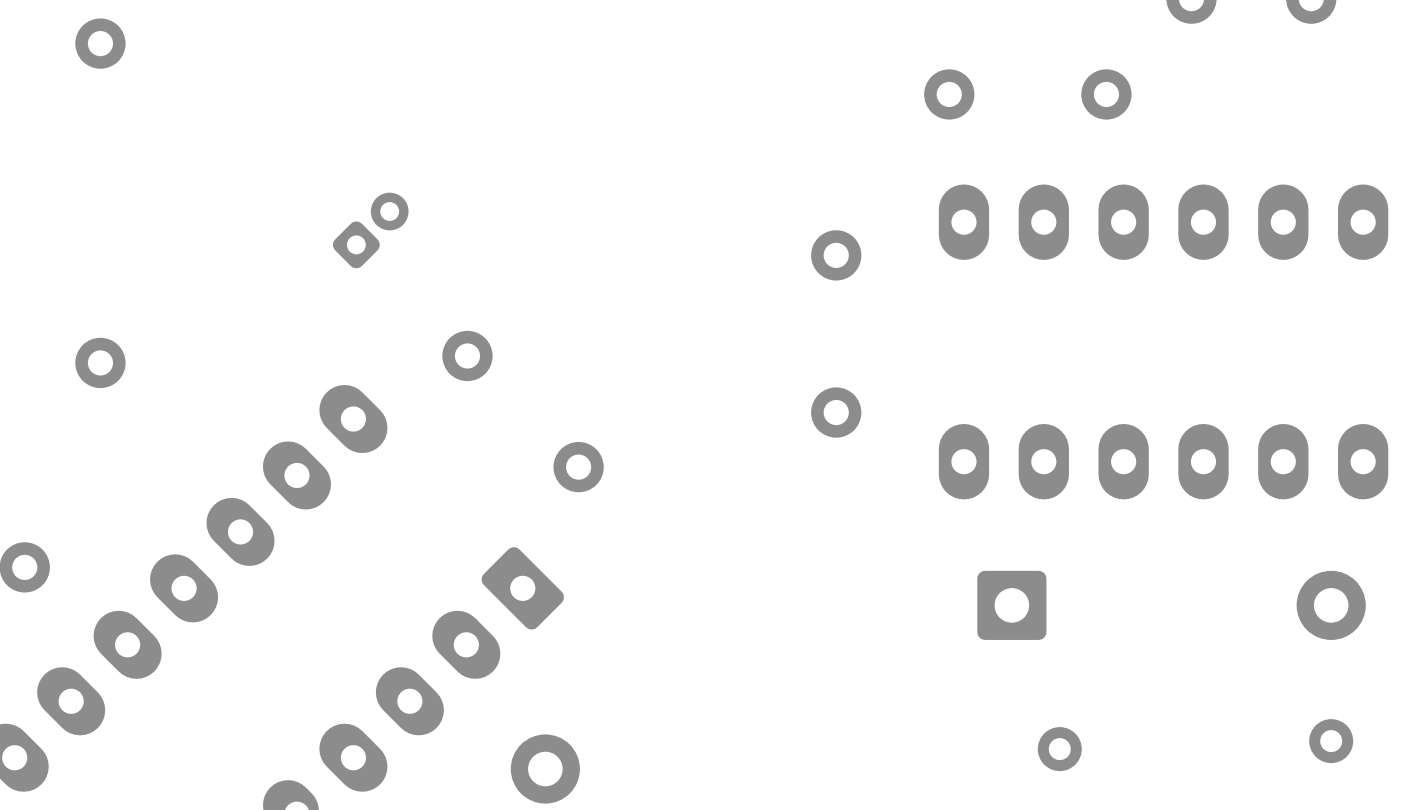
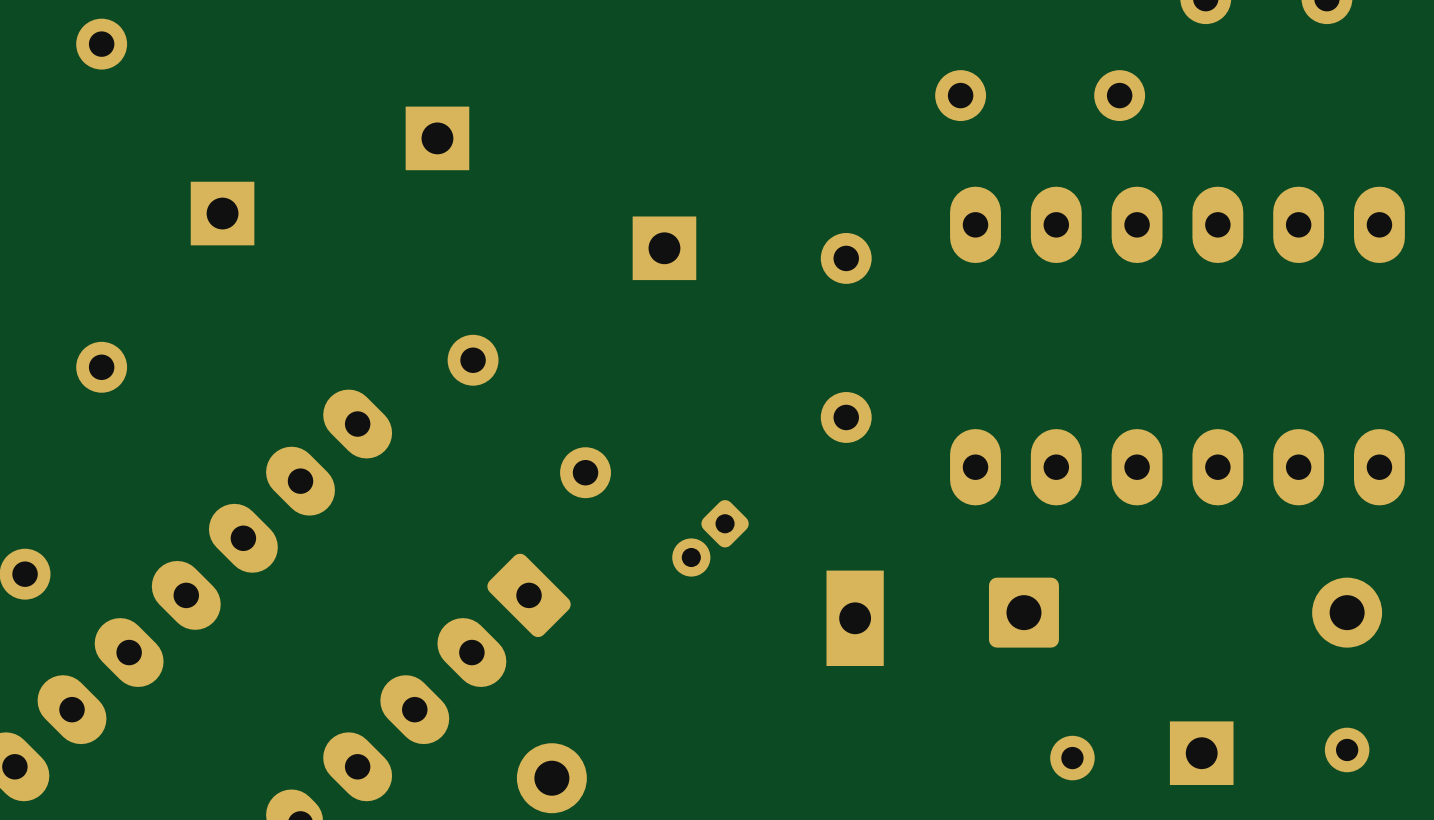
part: none -> (437, 138)
part: none -> (222, 213)
part rotation: 0° (370, 230) -> 180° (710, 538)
part position: (370, 230) -> (710, 538)
part: none -> (664, 248)
part: none -> (855, 618)
part: none -> (1201, 753)

